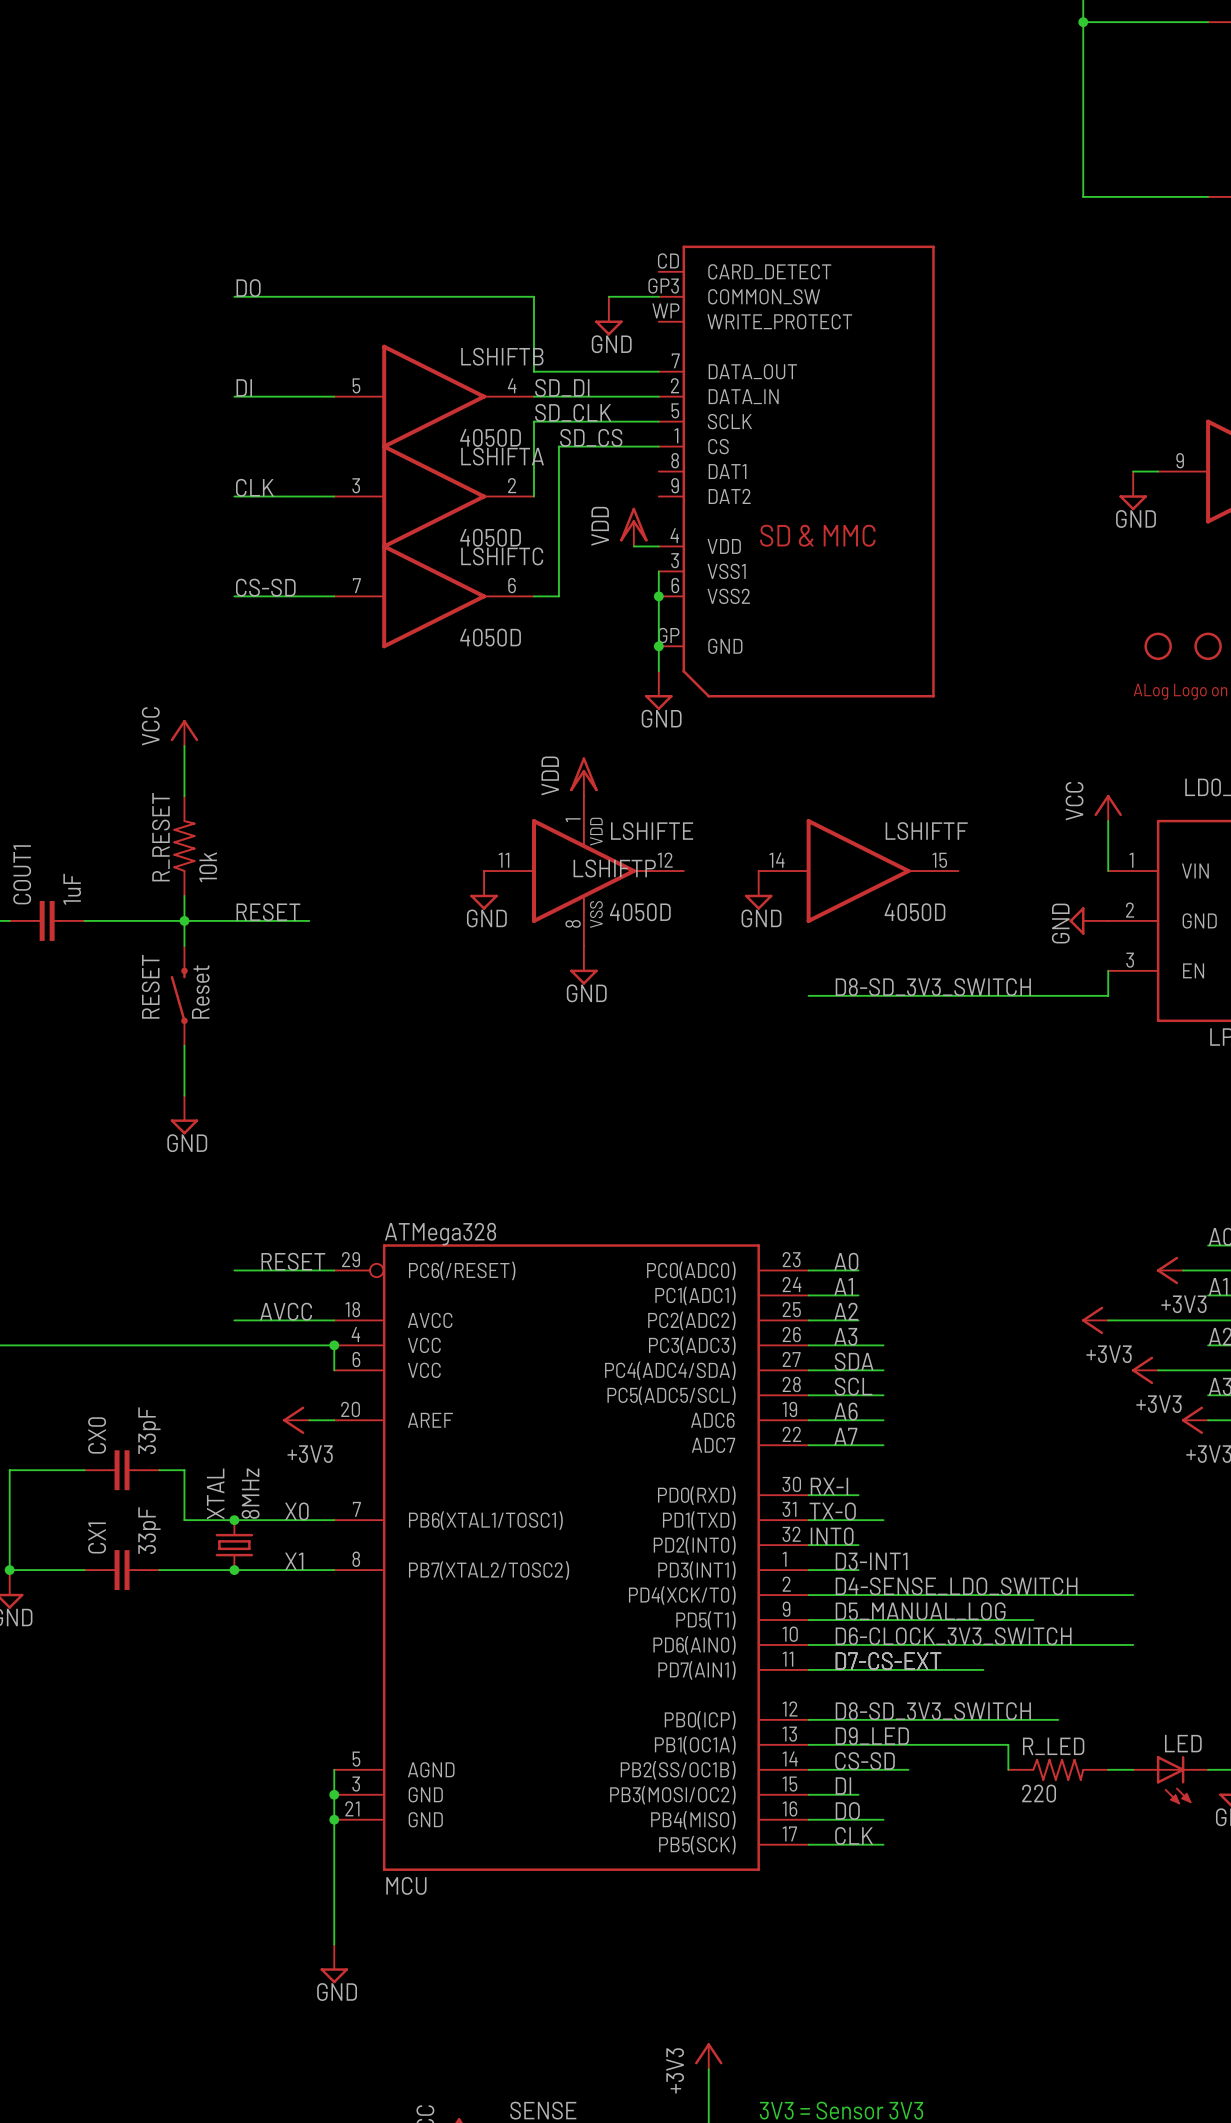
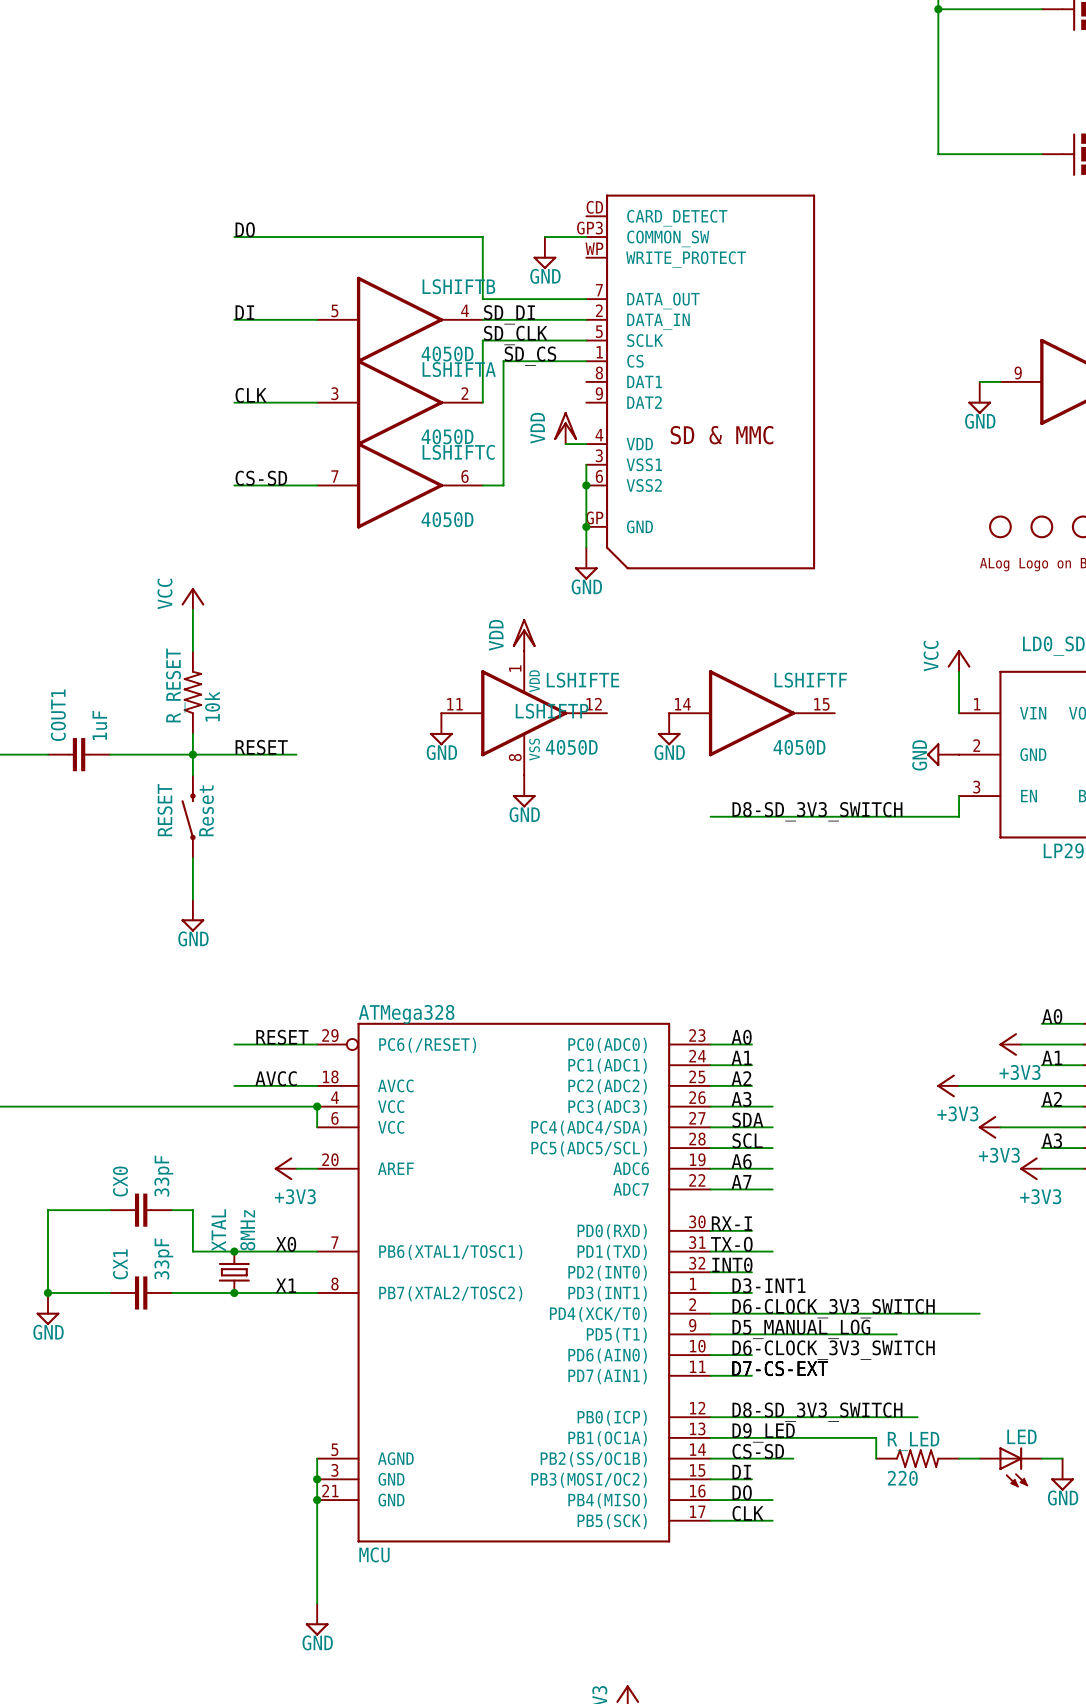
label: D4-SENSE_LDO_SWITCH (956, 1586) -> D6-CLOCK_3V3_SWITCH (833, 1308)
wire: (858, 1644) (1133, 1644) -> none
wire: (858, 1669) (983, 1669) -> none

